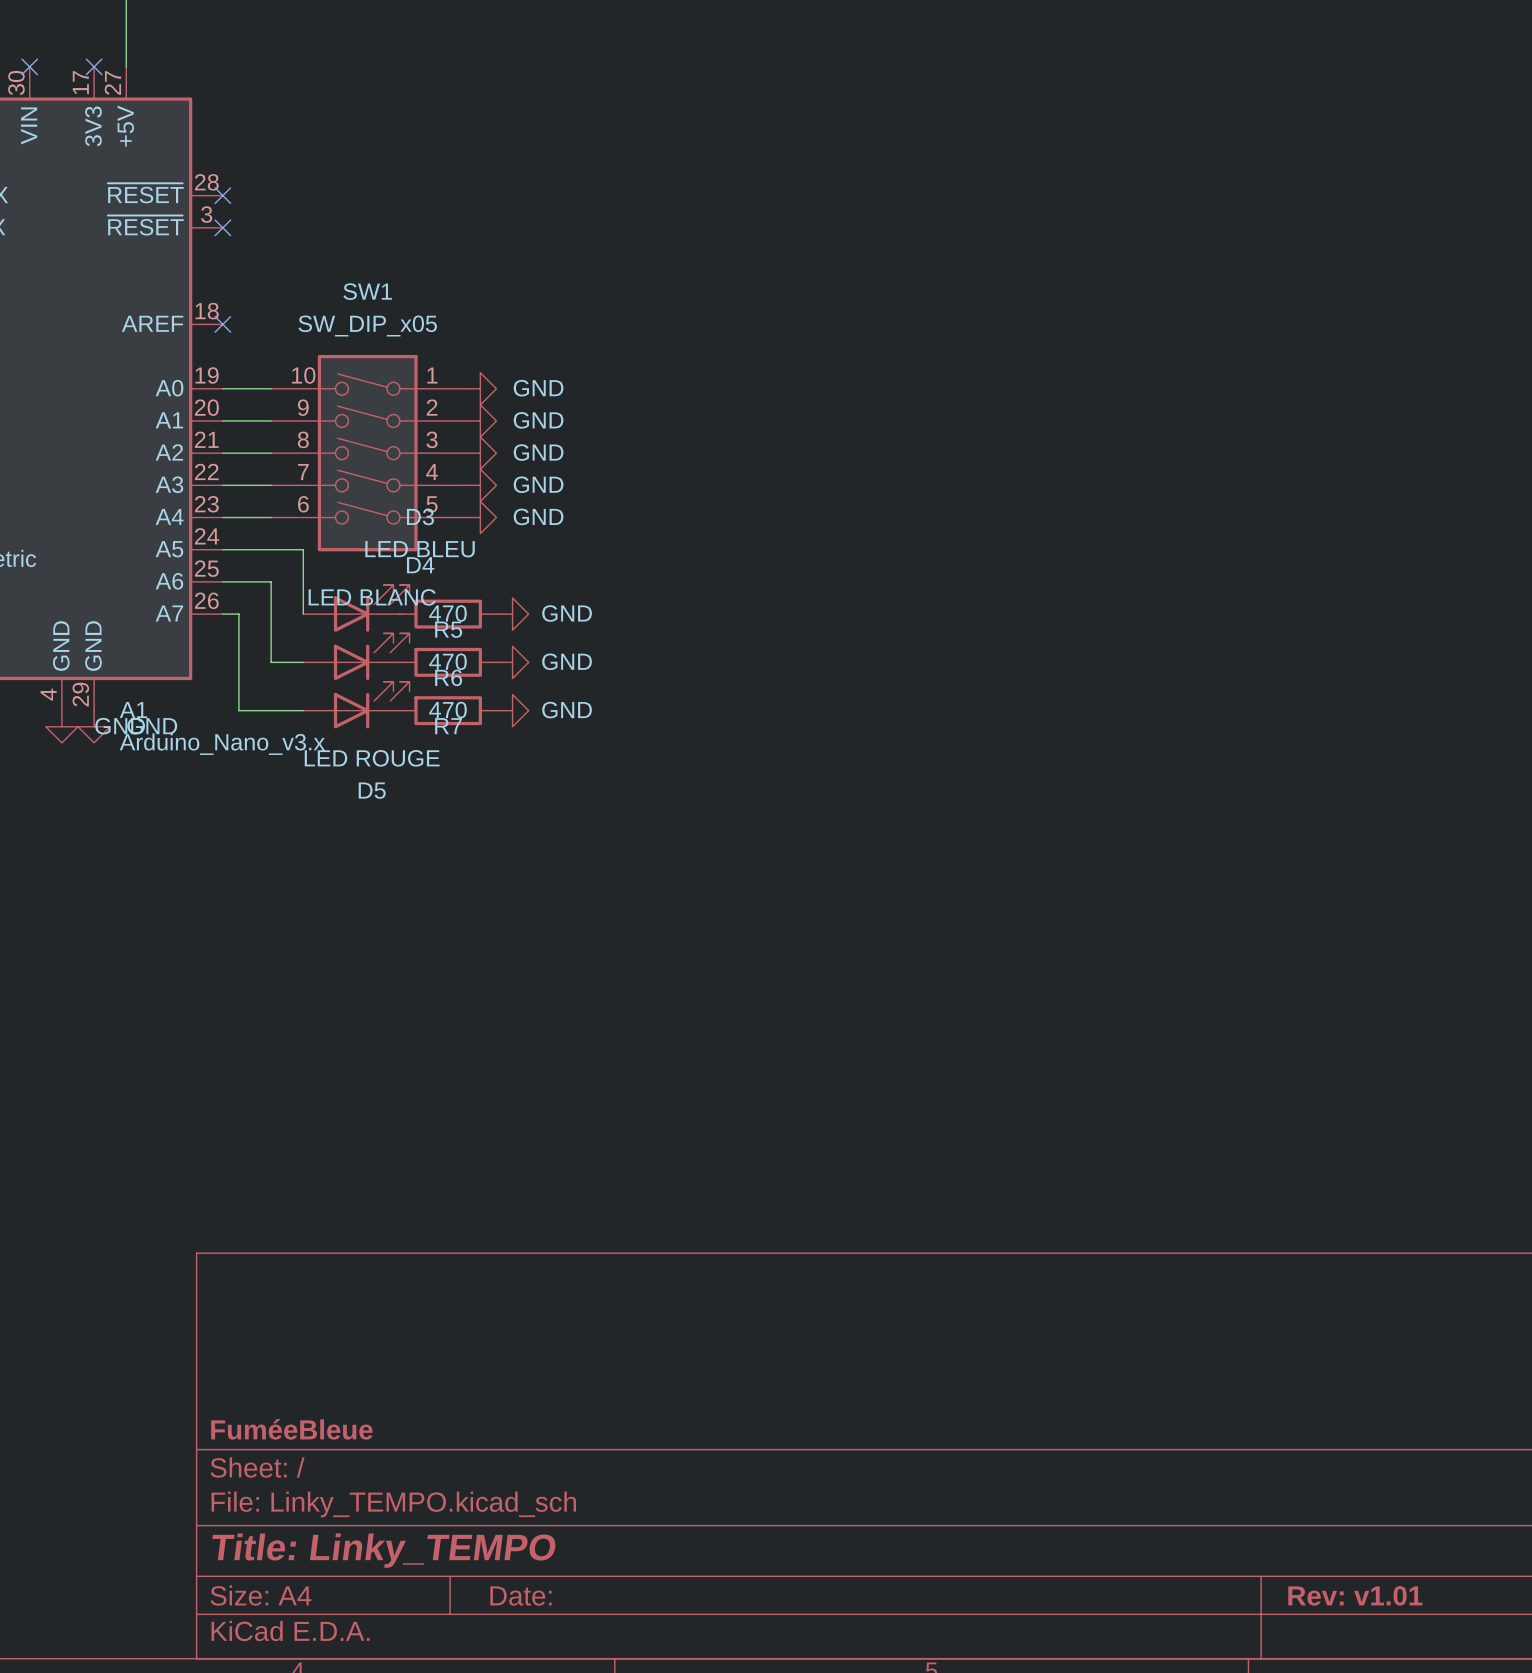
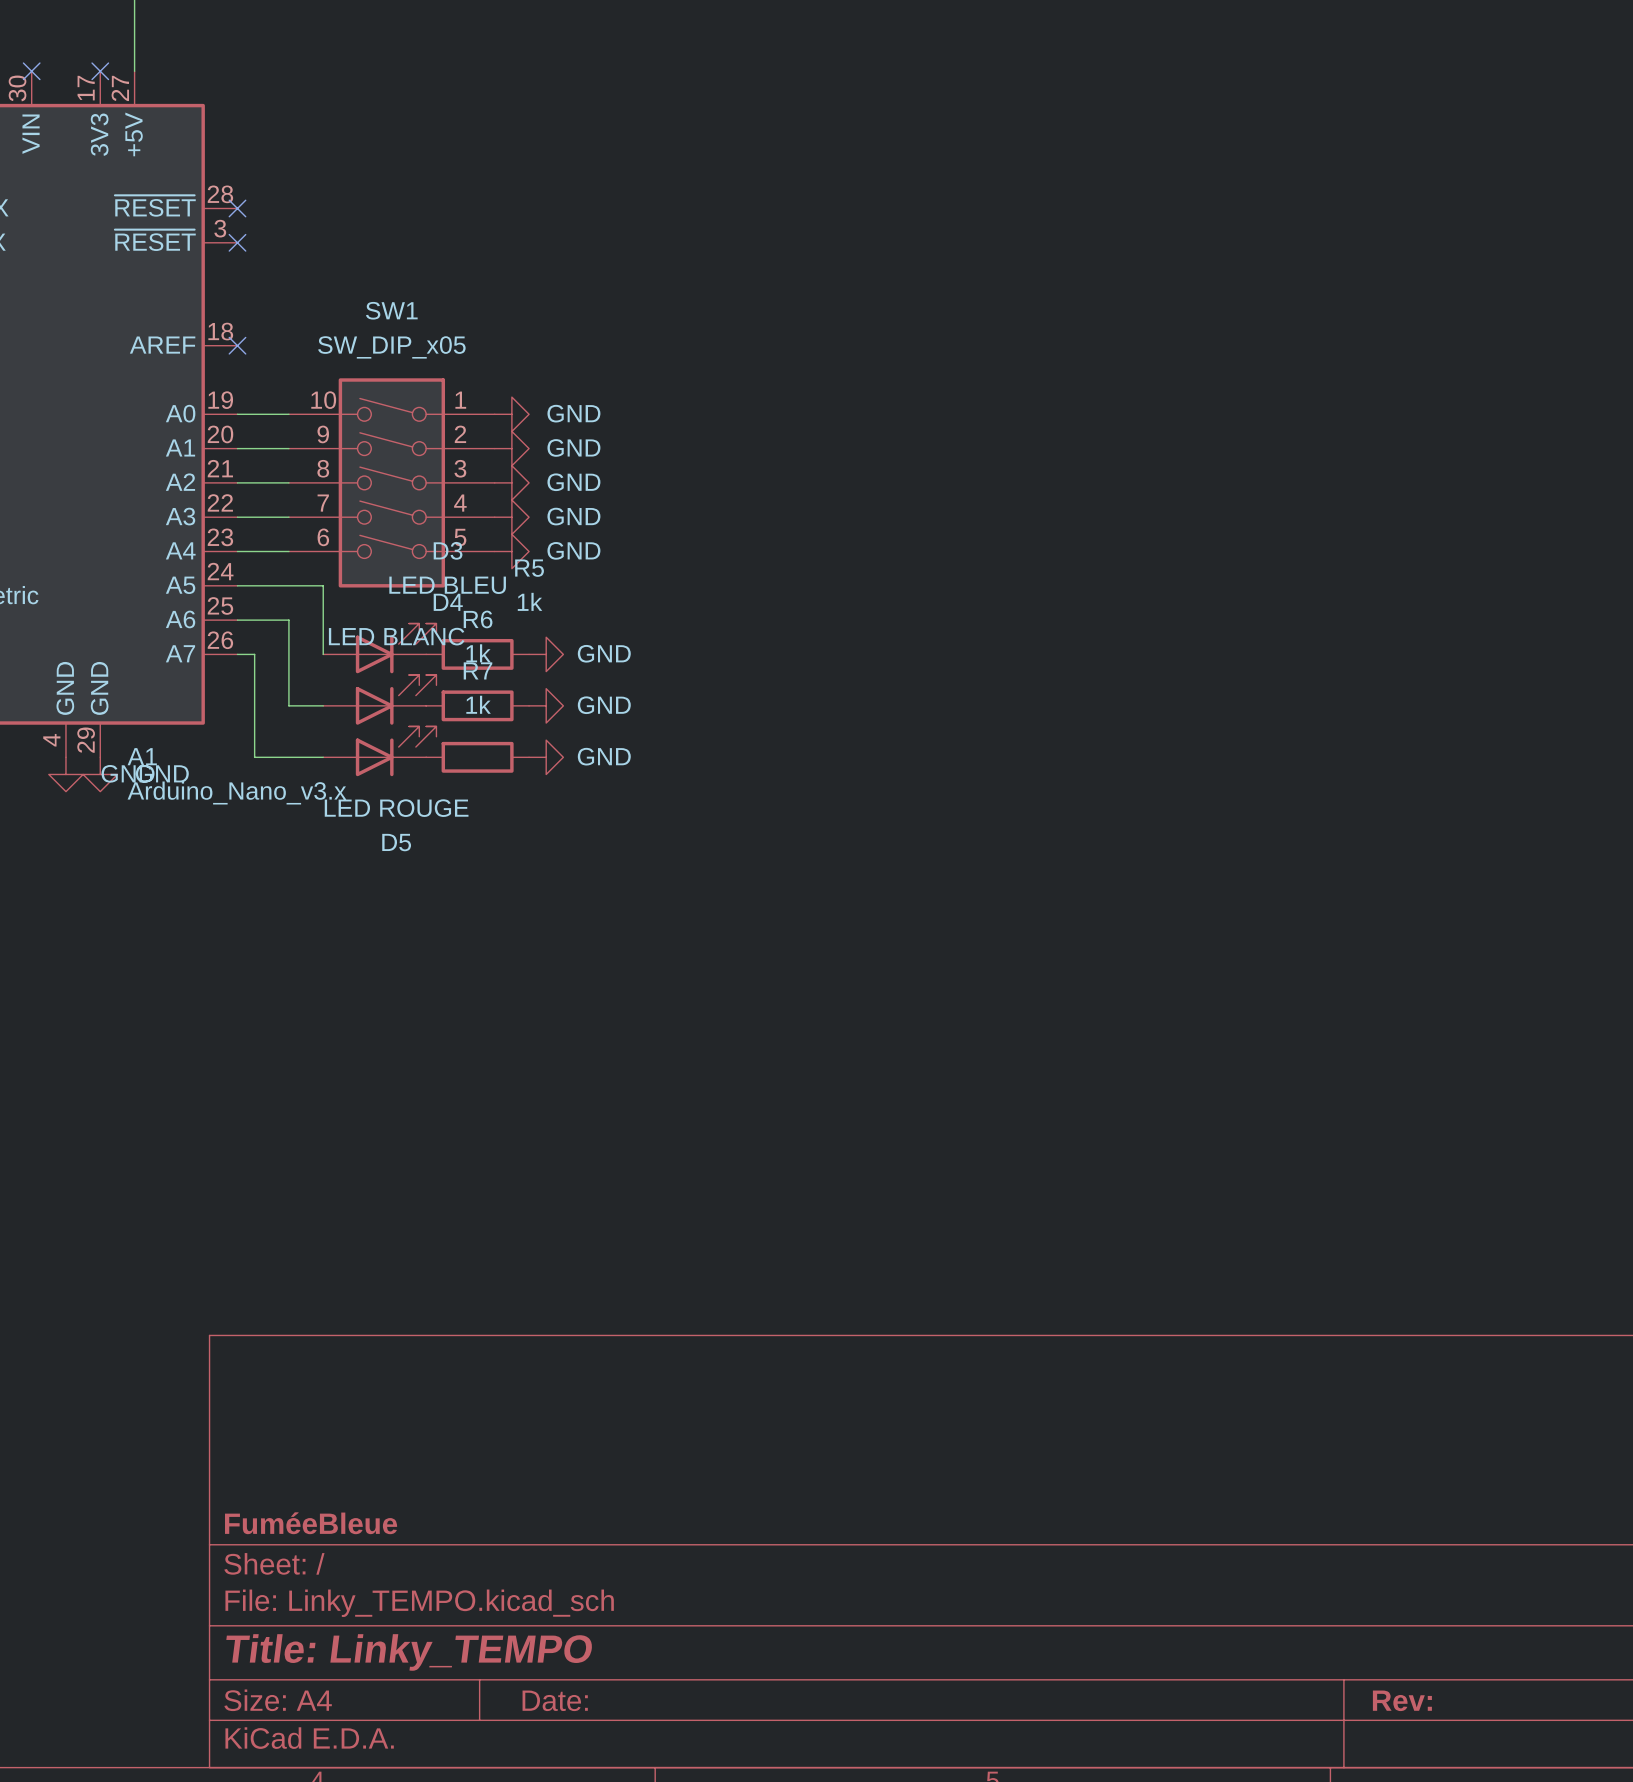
R5 value: 470 (447, 613) -> 1k (530, 601)
R5 name position: R5 (448, 629) -> R5 (529, 568)
R6 value: 470 (447, 661) -> 1k (478, 653)
R6 name position: R6 (448, 677) -> R6 (478, 619)
R7 value: 470 (447, 710) -> 1k (478, 704)
R7 name position: R7 (448, 726) -> R7 (477, 670)
title block: Rev: v1.01 (1355, 1595) -> Rev: (1402, 1700)

